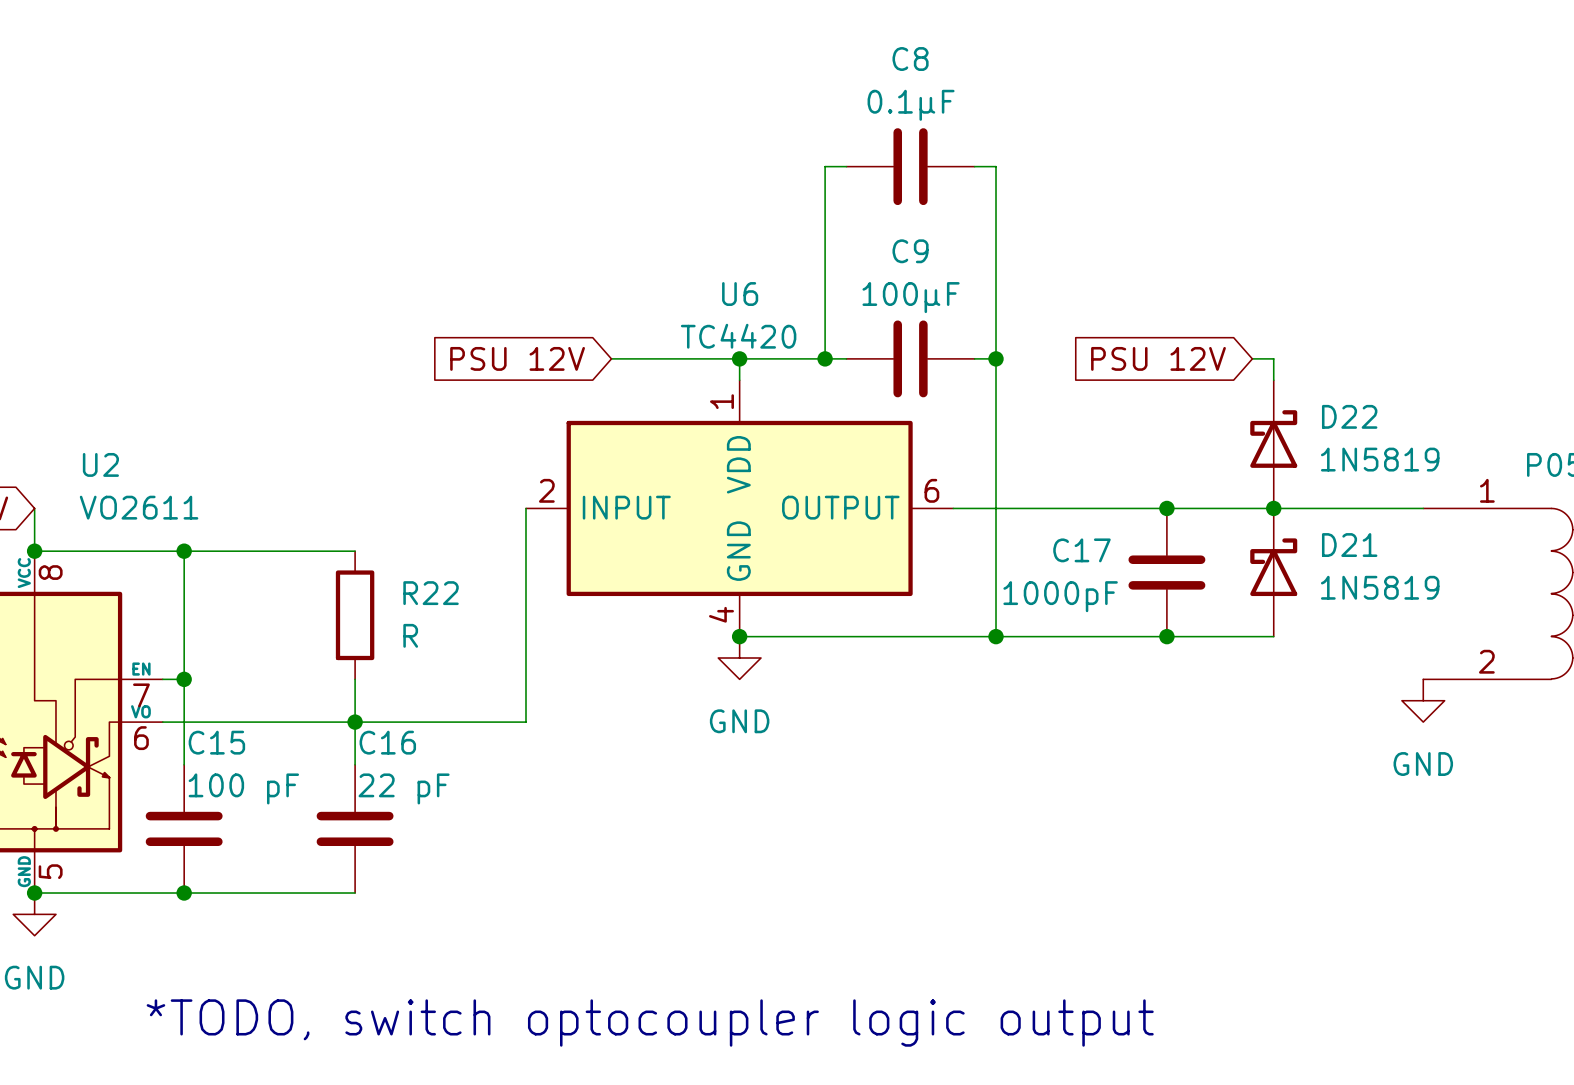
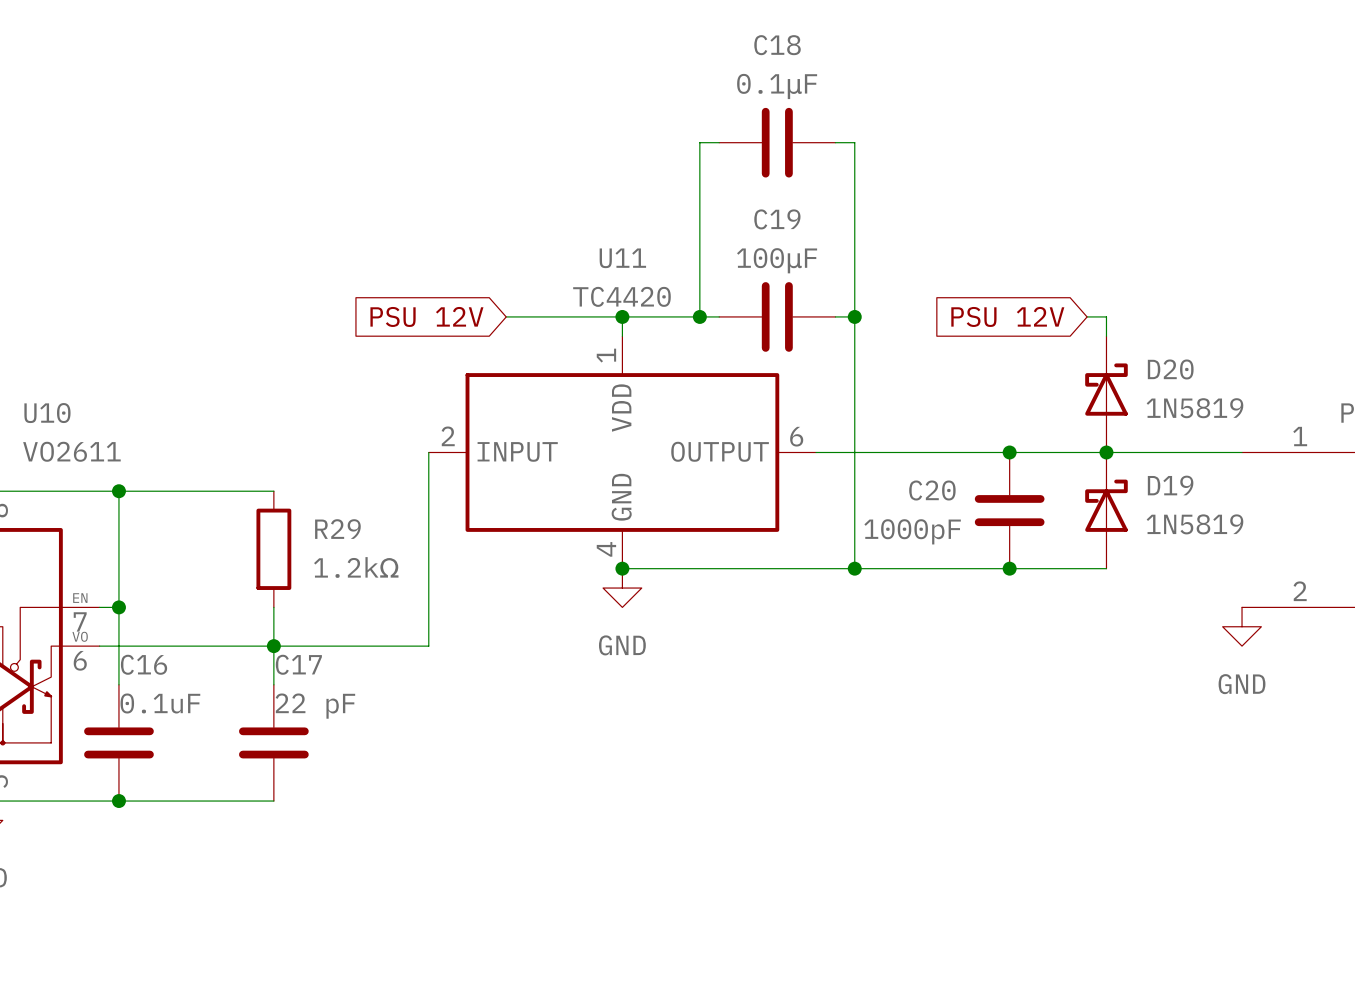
C8 name: C8 (910, 59) -> C18 (777, 45)
C9 name: C9 (910, 251) -> C19 (777, 219)
U6 name: U6 (740, 294) -> U11 (622, 258)
D22 name: D22 (1349, 416) -> D20 (1170, 369)
U2 name: U2 (100, 464) -> U10 (47, 413)
D21 name: D21 (1349, 545) -> D19 (1170, 485)
C17 name: C17 (1081, 550) -> C20 (932, 490)
R22 name: R22 (431, 593) -> R29 (337, 529)
R22 value: R (410, 635) -> 1.2kΩ (356, 567)
C15 name: C15 (216, 742) -> C16 (144, 664)
C16 name: C16 (387, 742) -> C17 (298, 664)
C15 value: 100 pF (243, 788) -> 0.1uF (160, 703)
text: *TODO, switch optocoupler logic output (650, 1023) -> none

